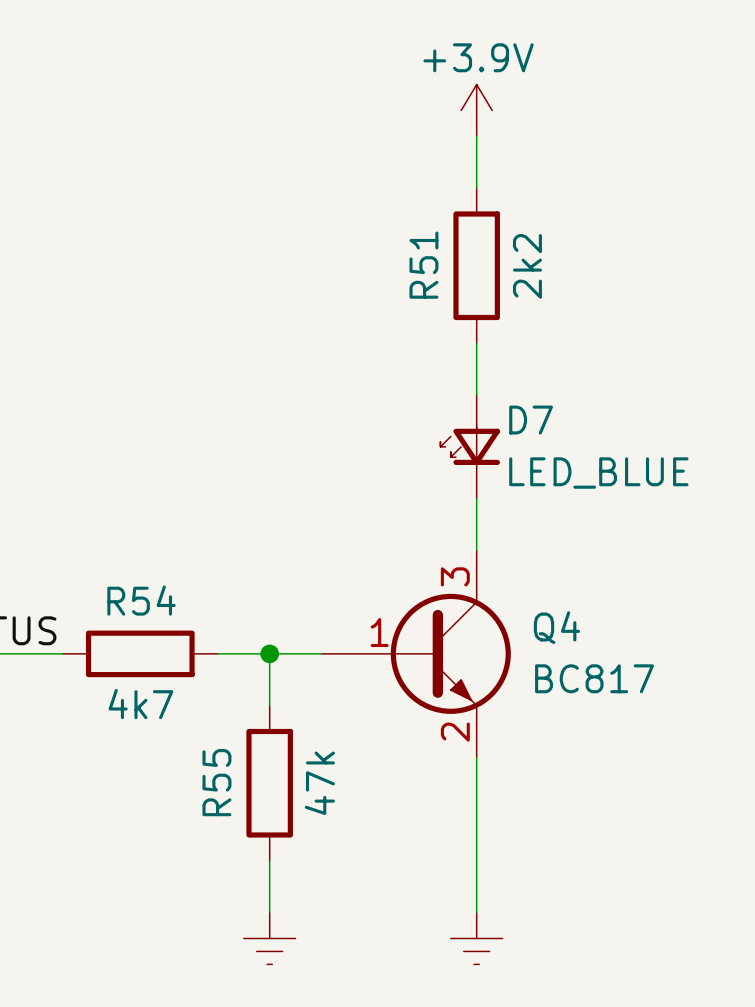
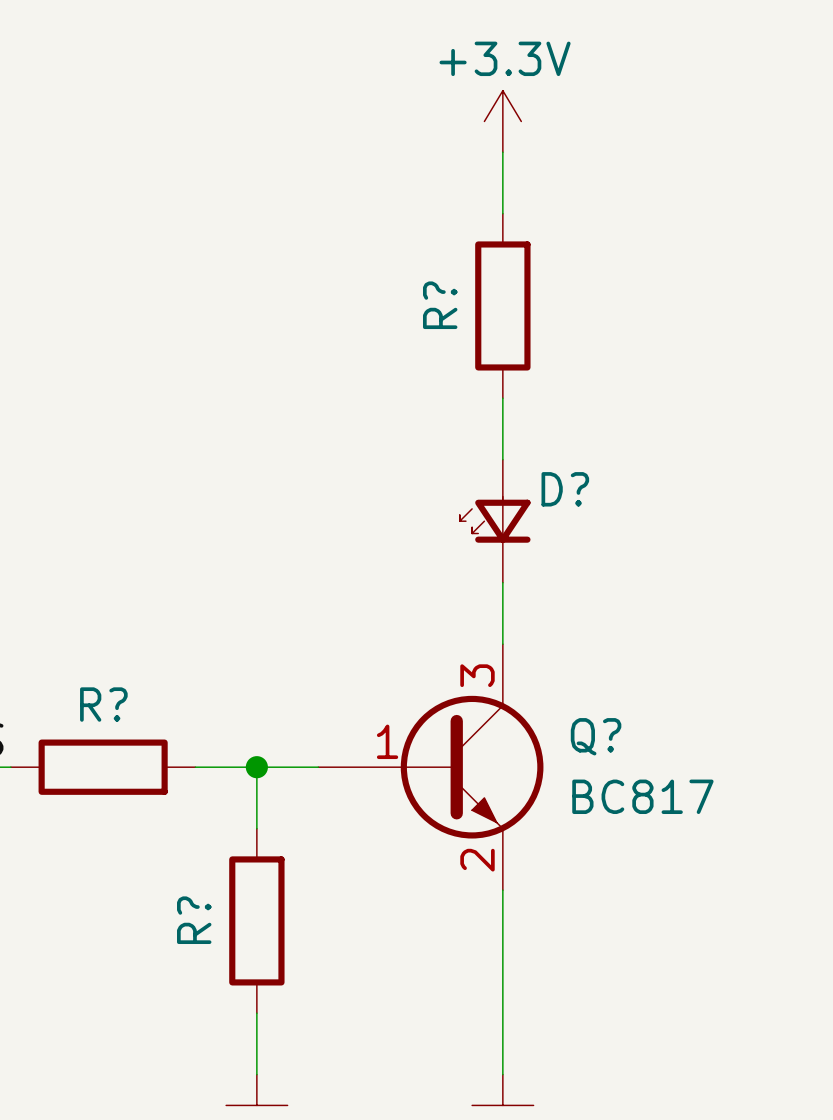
power symbol: +3.9V (476, 110) -> +3.3V (502, 121)
R51 name: R51 (423, 265) -> R? (440, 305)
R51 value: 2k2 (527, 266) -> none
D7 name: D7 (531, 420) -> D? (565, 489)
D7 value: LED_BLUE (598, 473) -> none
R54 name: R54 (141, 600) -> R? (103, 704)
Q4 name: Q4 (556, 627) -> Q? (596, 736)
R54 value: 4k7 (140, 704) -> none
R55 name: R55 (216, 782) -> R? (194, 920)
R55 value: 47k (319, 783) -> none

